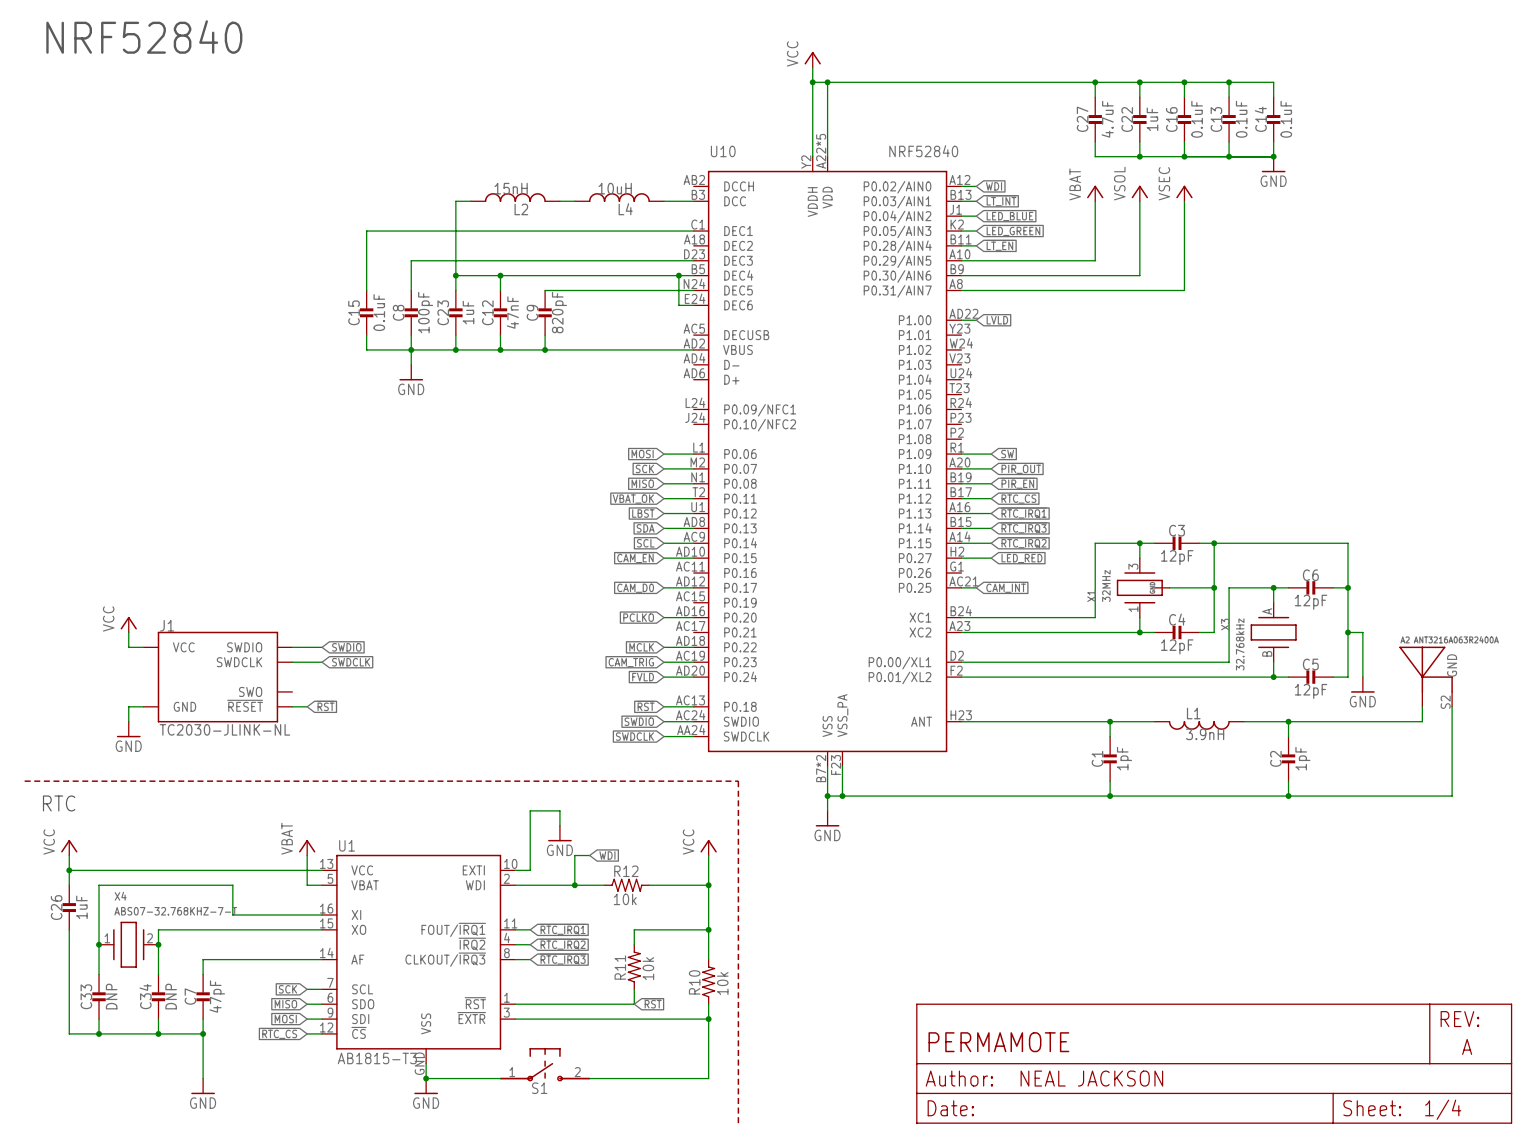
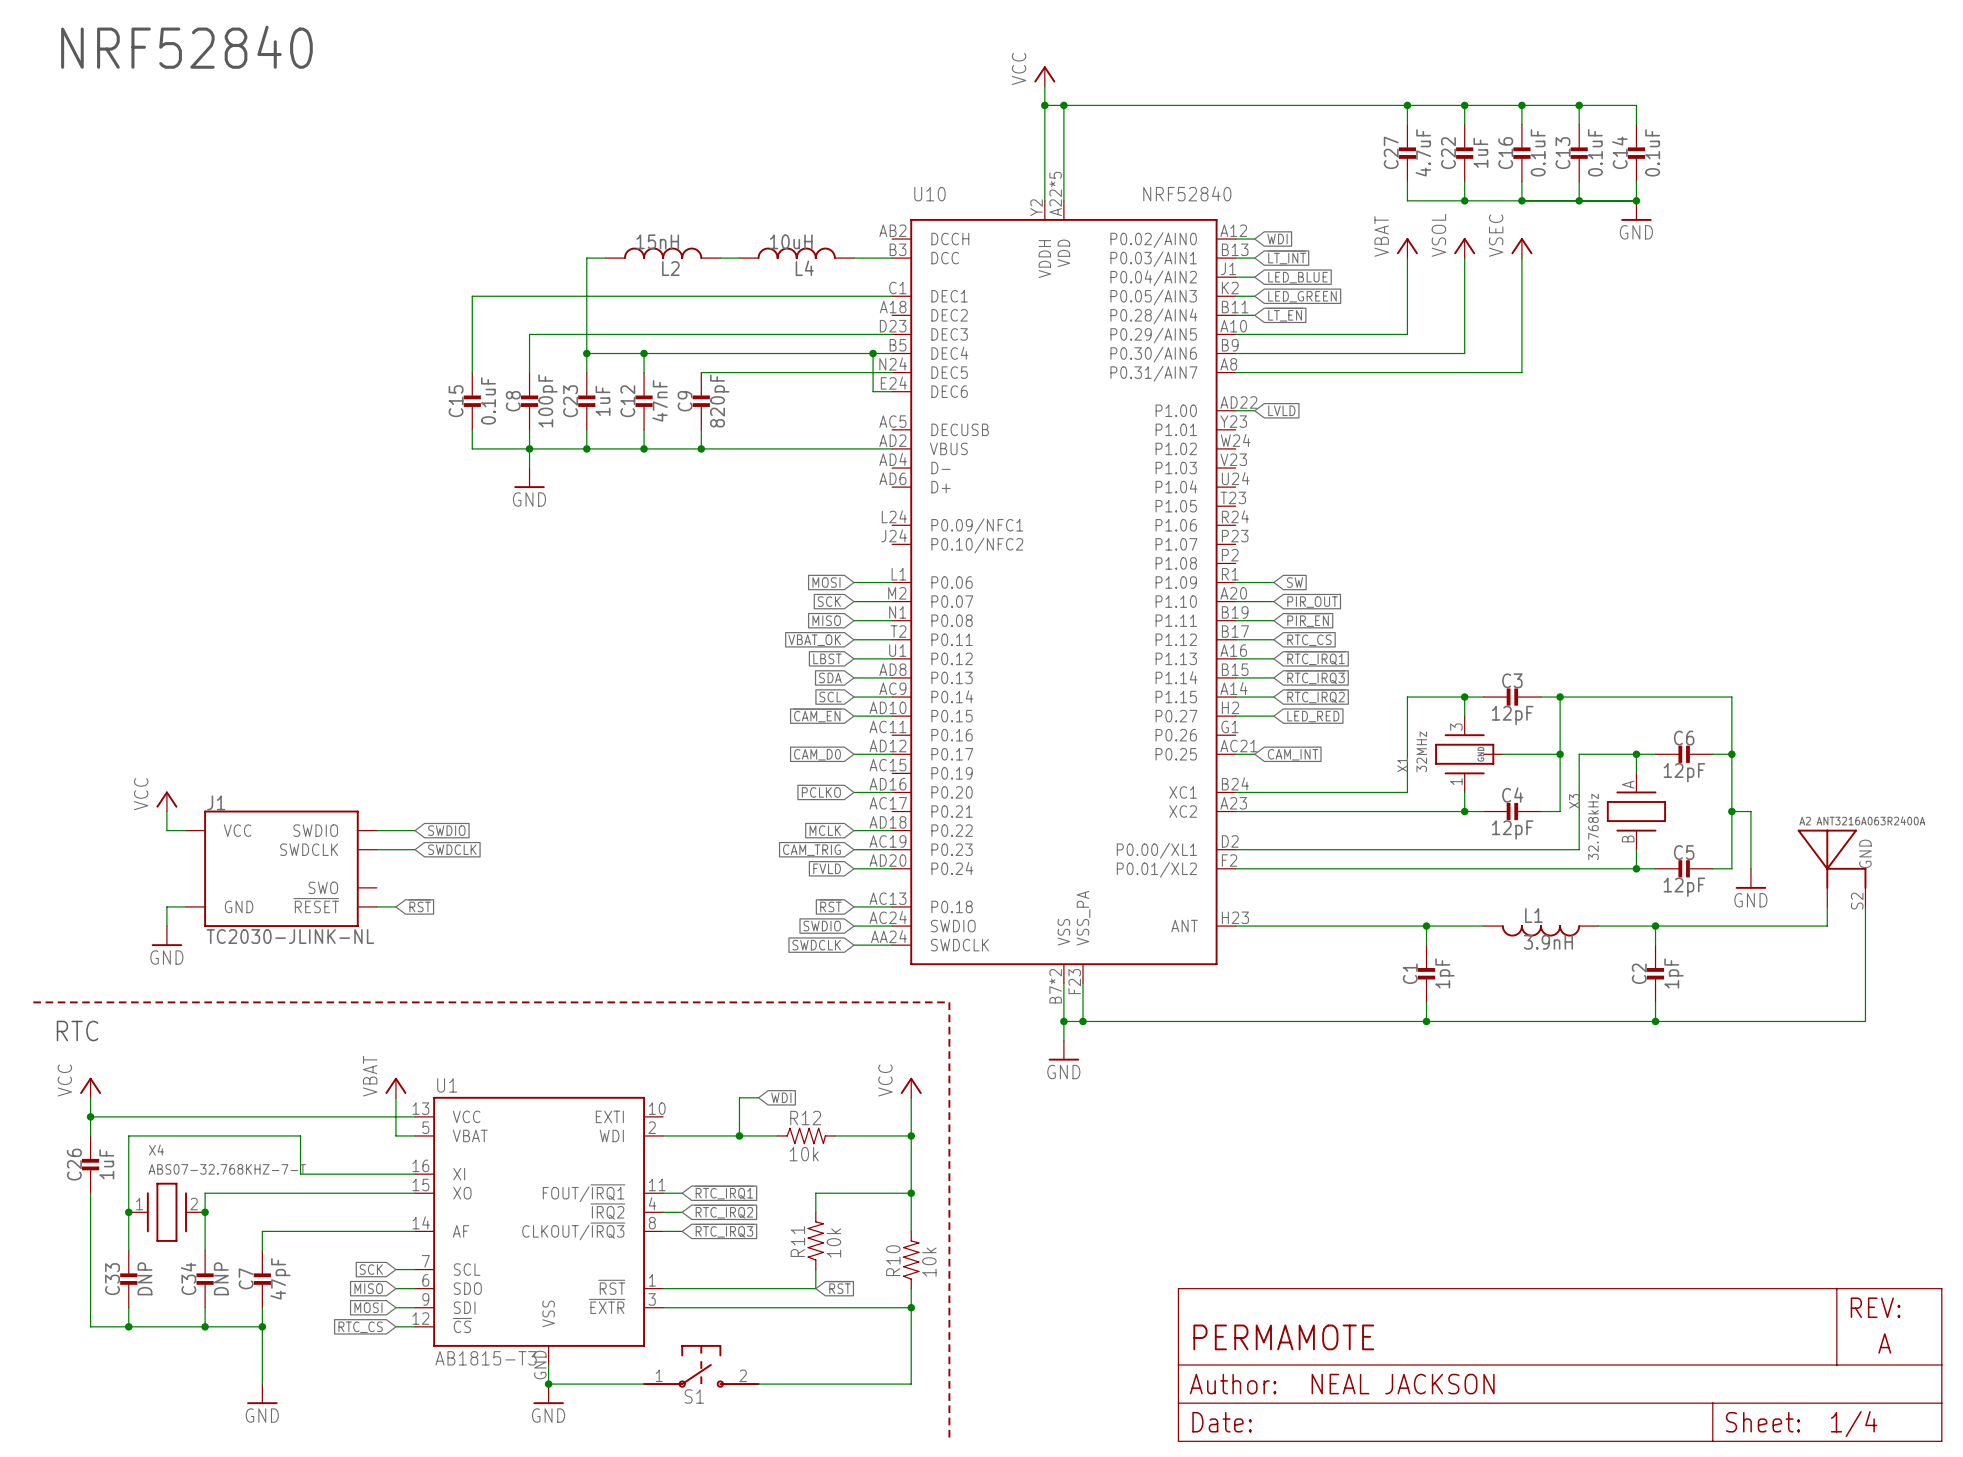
wire: (559, 825) (559, 810) (530, 810) (530, 870) (515, 870) -> none
power symbol: GND (559, 833) -> none

